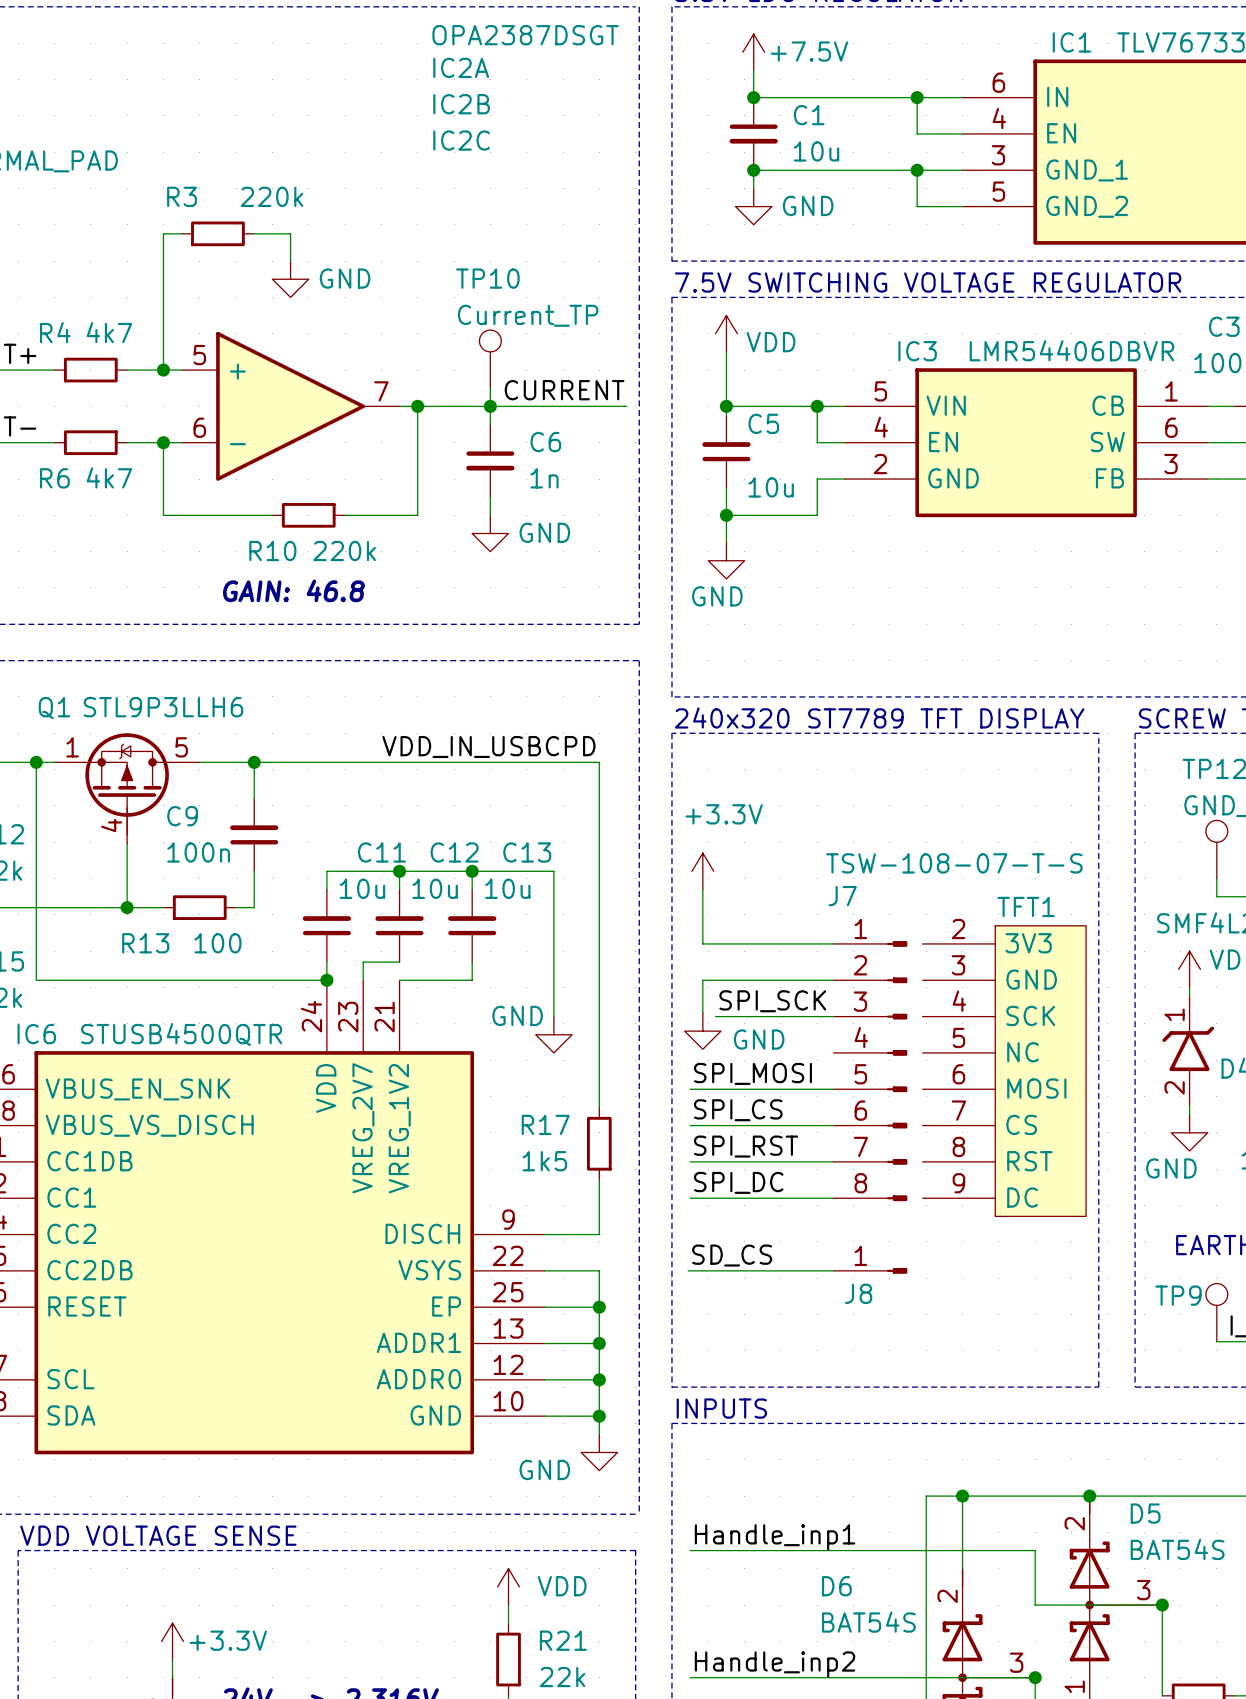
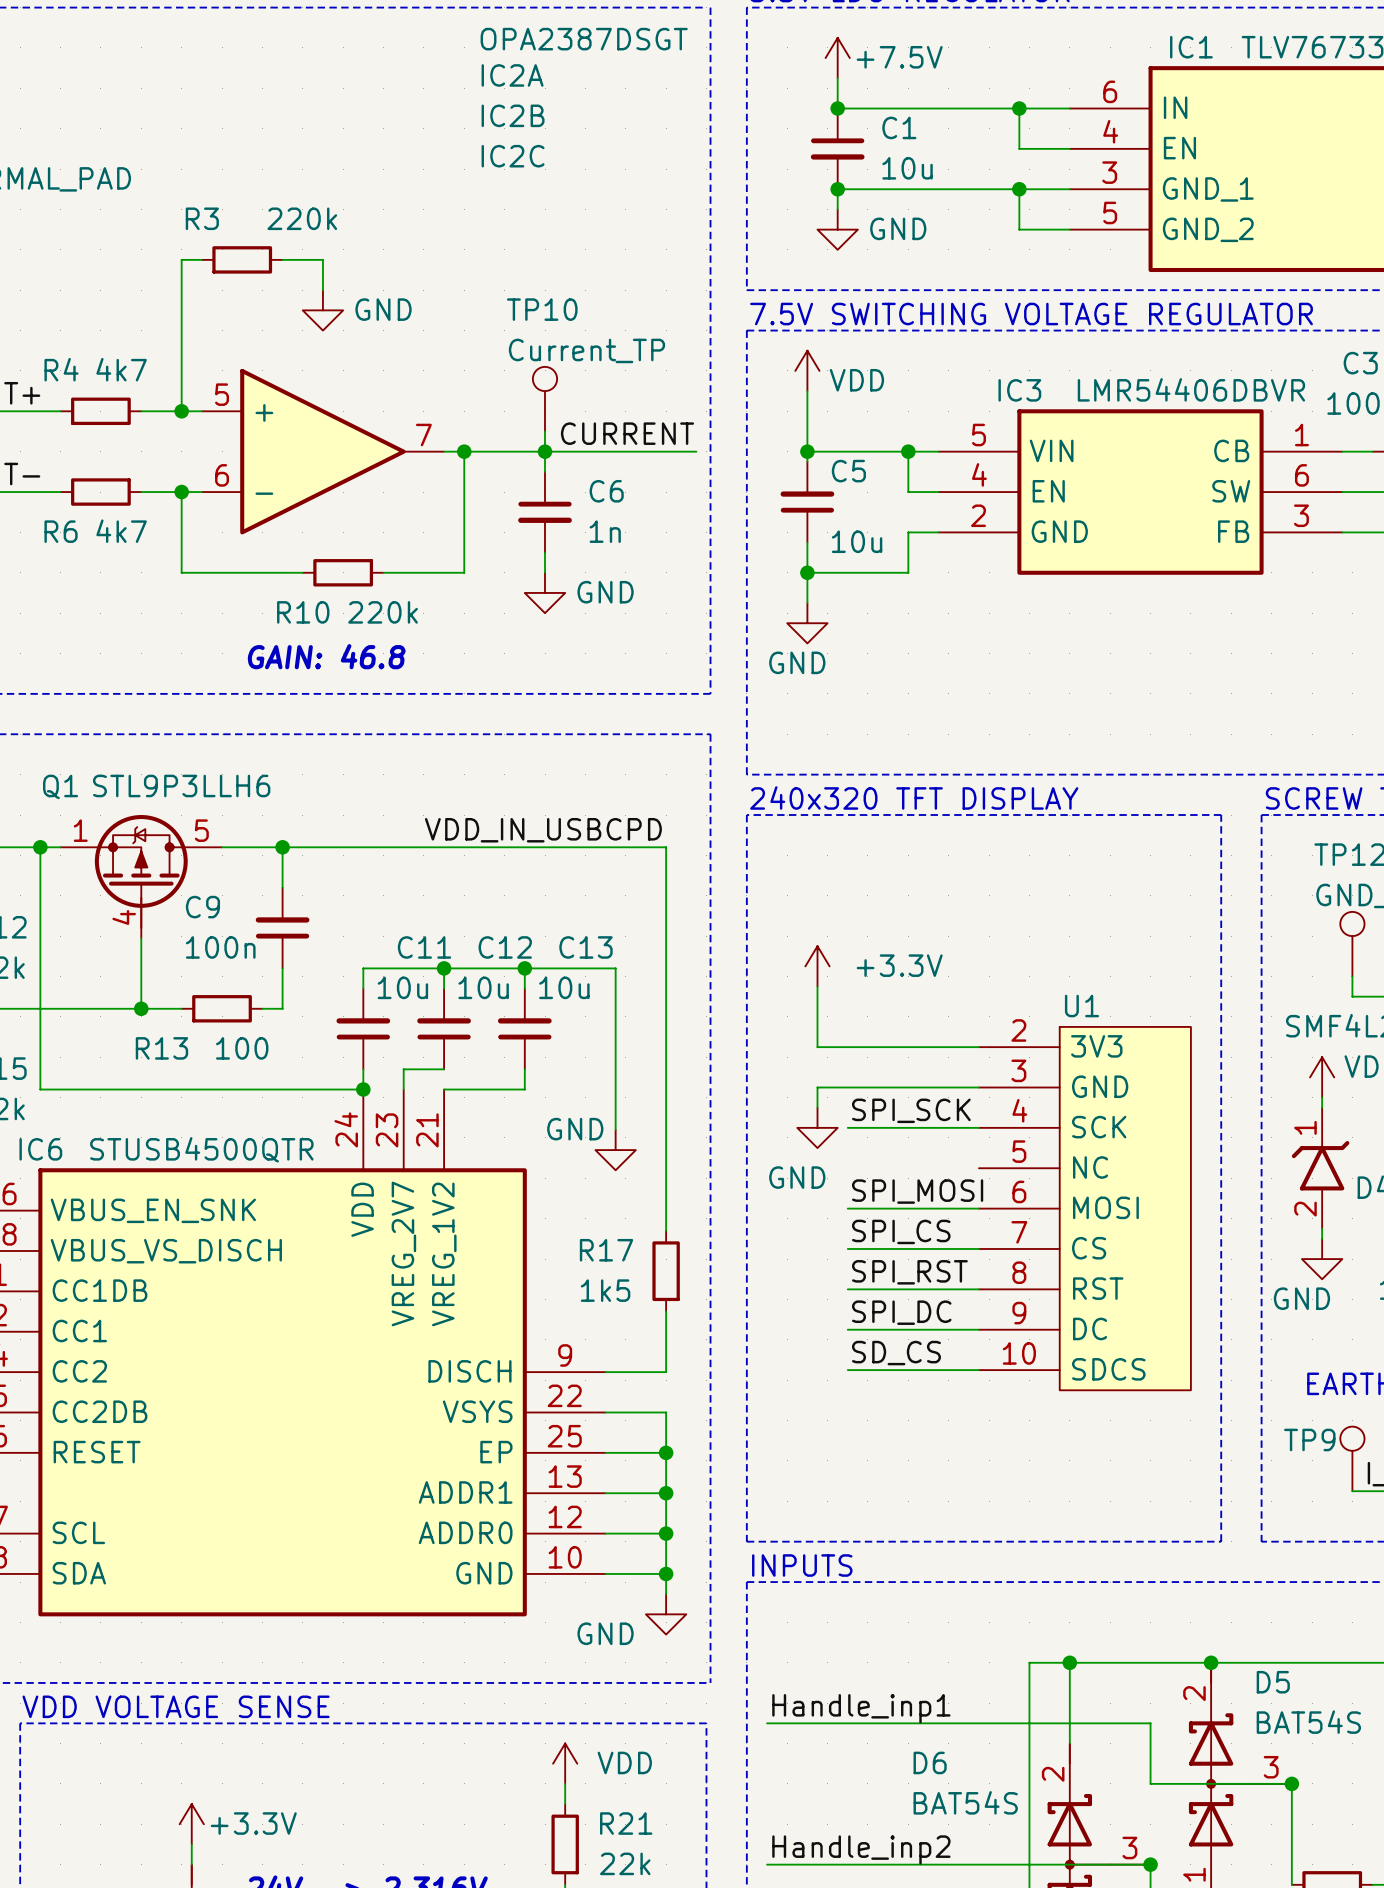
text: 240x320 ST7789 TFT DISPLAY (879, 717) -> 240x320 TFT DISPLAY (914, 797)
power symbol text position: +3.3V (724, 814) -> +3.3V (899, 965)
power symbol position: +3.3V (702, 871) -> +3.3V (817, 966)
wire: none -> (817, 986) (817, 1047) (978, 1047)
wire: (702, 889) (702, 943) (833, 943) -> none
wire: none -> (978, 1087) (817, 1087) (817, 1107)
wire: (833, 980) (702, 980) (702, 1012) -> none
label position: SPI_SCK (772, 1001) -> SPI_SCK (911, 1110)
wire: (715, 1016) (833, 1016) -> (847, 1127) (978, 1127)
power symbol position: GND (702, 1031) -> GND (817, 1127)
power symbol text position: GND (759, 1039) -> GND (797, 1177)
J7: TSW-108-07-T-S (870, 1071) -> none
TFT1: (1004, 1071) -> none
label position: SPI_MOSI (752, 1073) -> SPI_MOSI (917, 1191)
wire: none -> (847, 1208) (978, 1208)
U1: none -> (1084, 1208)
wire: (690, 1089) (833, 1089) -> none
label position: SPI_CS (738, 1110) -> SPI_CS (901, 1231)
wire: none -> (847, 1248) (978, 1248)
wire: (690, 1125) (833, 1125) -> none
label position: SPI_RST (746, 1146) -> SPI_RST (909, 1272)
wire: none -> (847, 1289) (978, 1289)
wire: (690, 1161) (833, 1161) -> none
label position: SPI_DC (738, 1182) -> SPI_DC (901, 1312)
wire: none -> (847, 1329) (978, 1329)
wire: (690, 1198) (833, 1198) -> none
wire: none -> (847, 1370) (978, 1370)
label position: SD_CS (732, 1255) -> SD_CS (896, 1353)
wire: (688, 1270) (833, 1270) -> none
J8: (870, 1270) -> none

